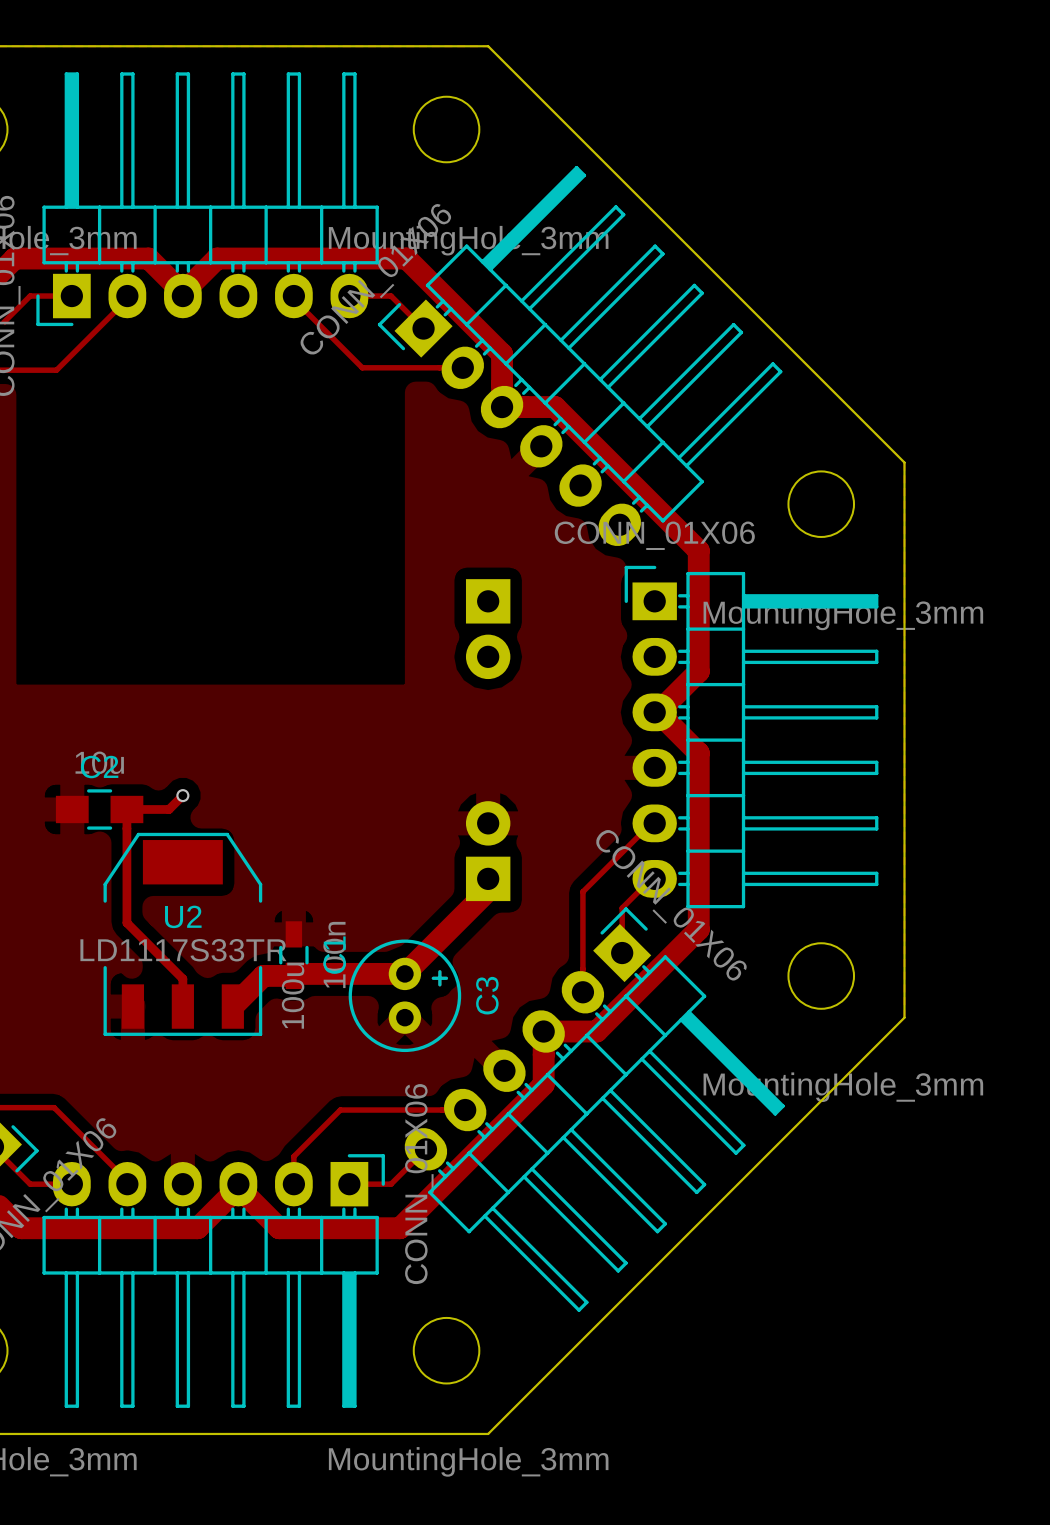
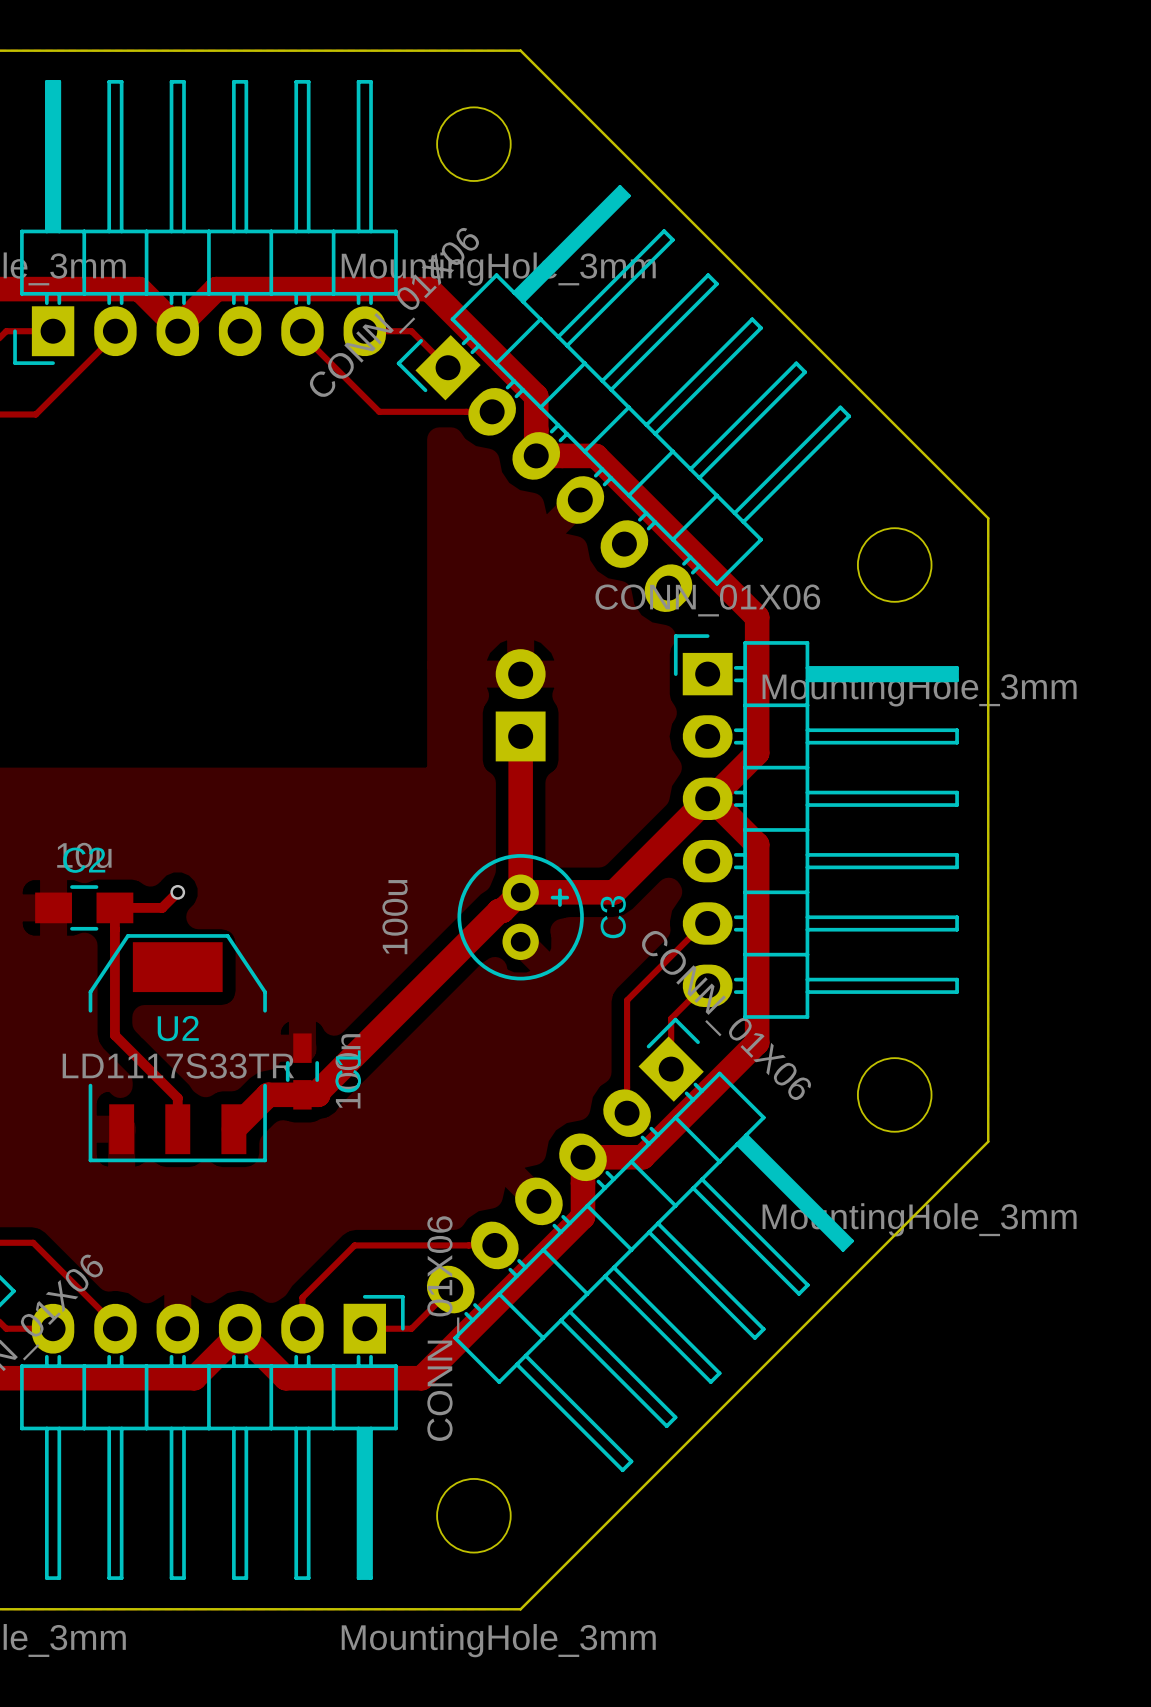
part rotation: 0° (488, 629) -> 180° (520, 705)
track: none -> (520, 736) (520, 892) (614, 892) (707, 798)
part: (488, 851) -> none
track: (488, 878) (488, 890) (404, 973) (295, 973) (293, 975) -> (520, 892) (502, 910) (499, 910) (318, 1091) (318, 1094) (302, 1094)
C3 position: (404, 995) -> (520, 917)

